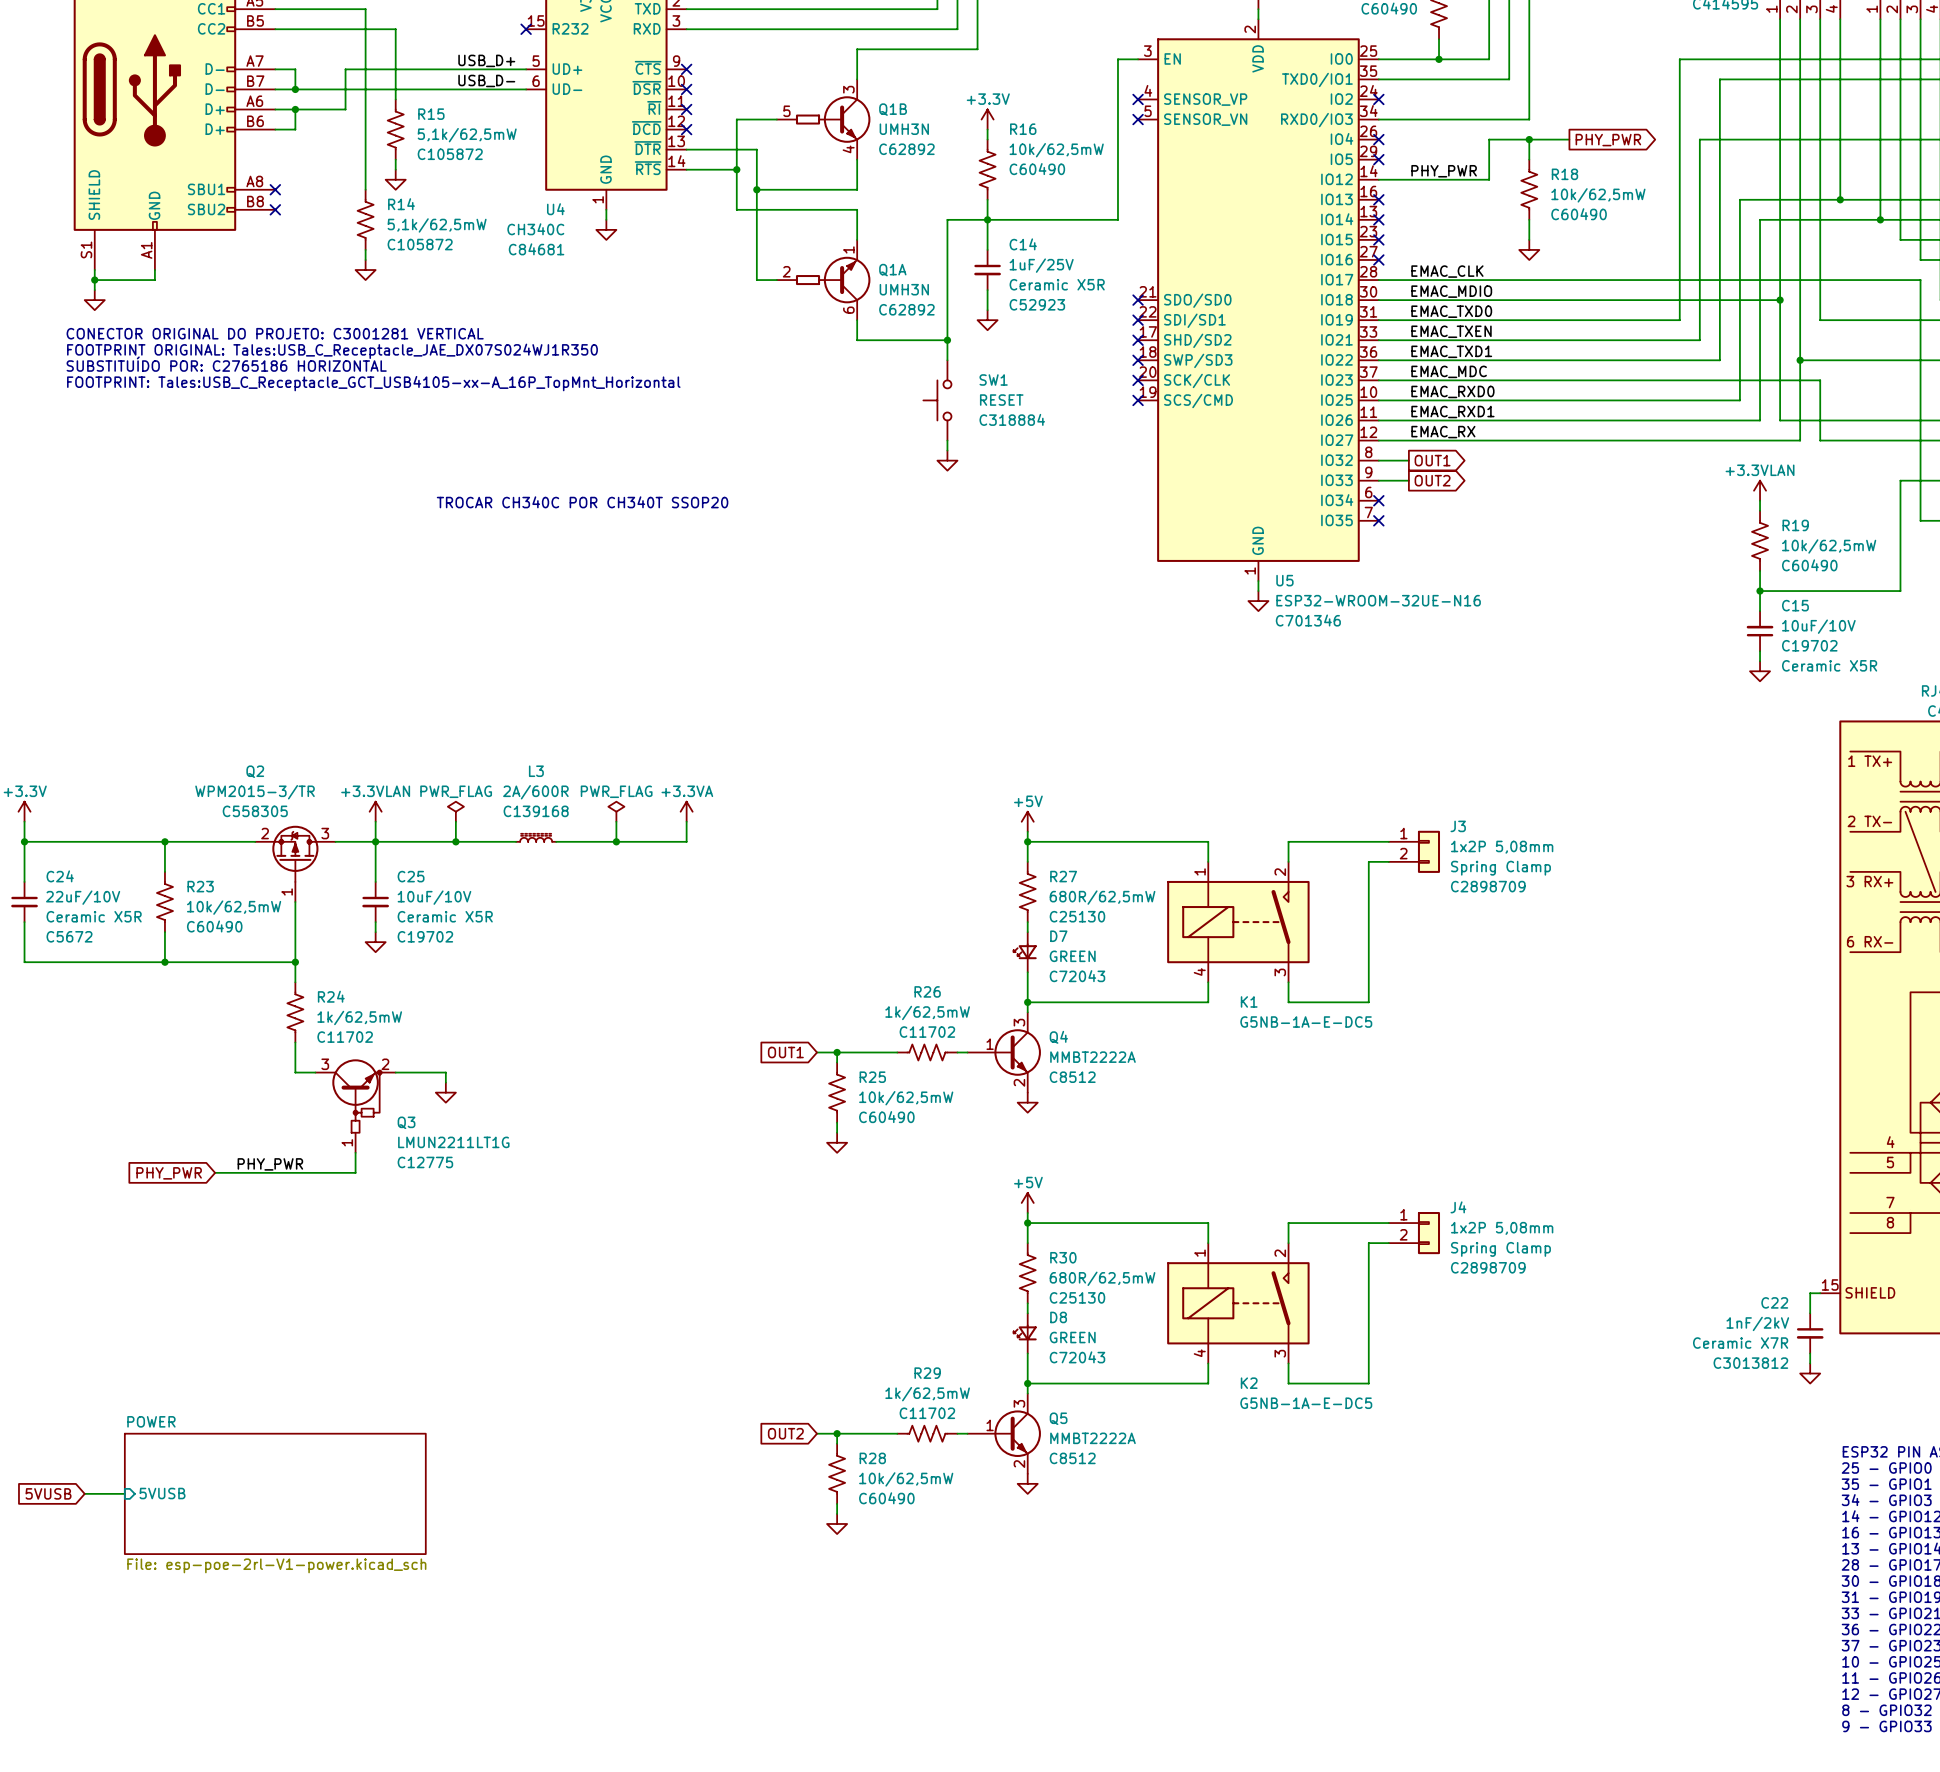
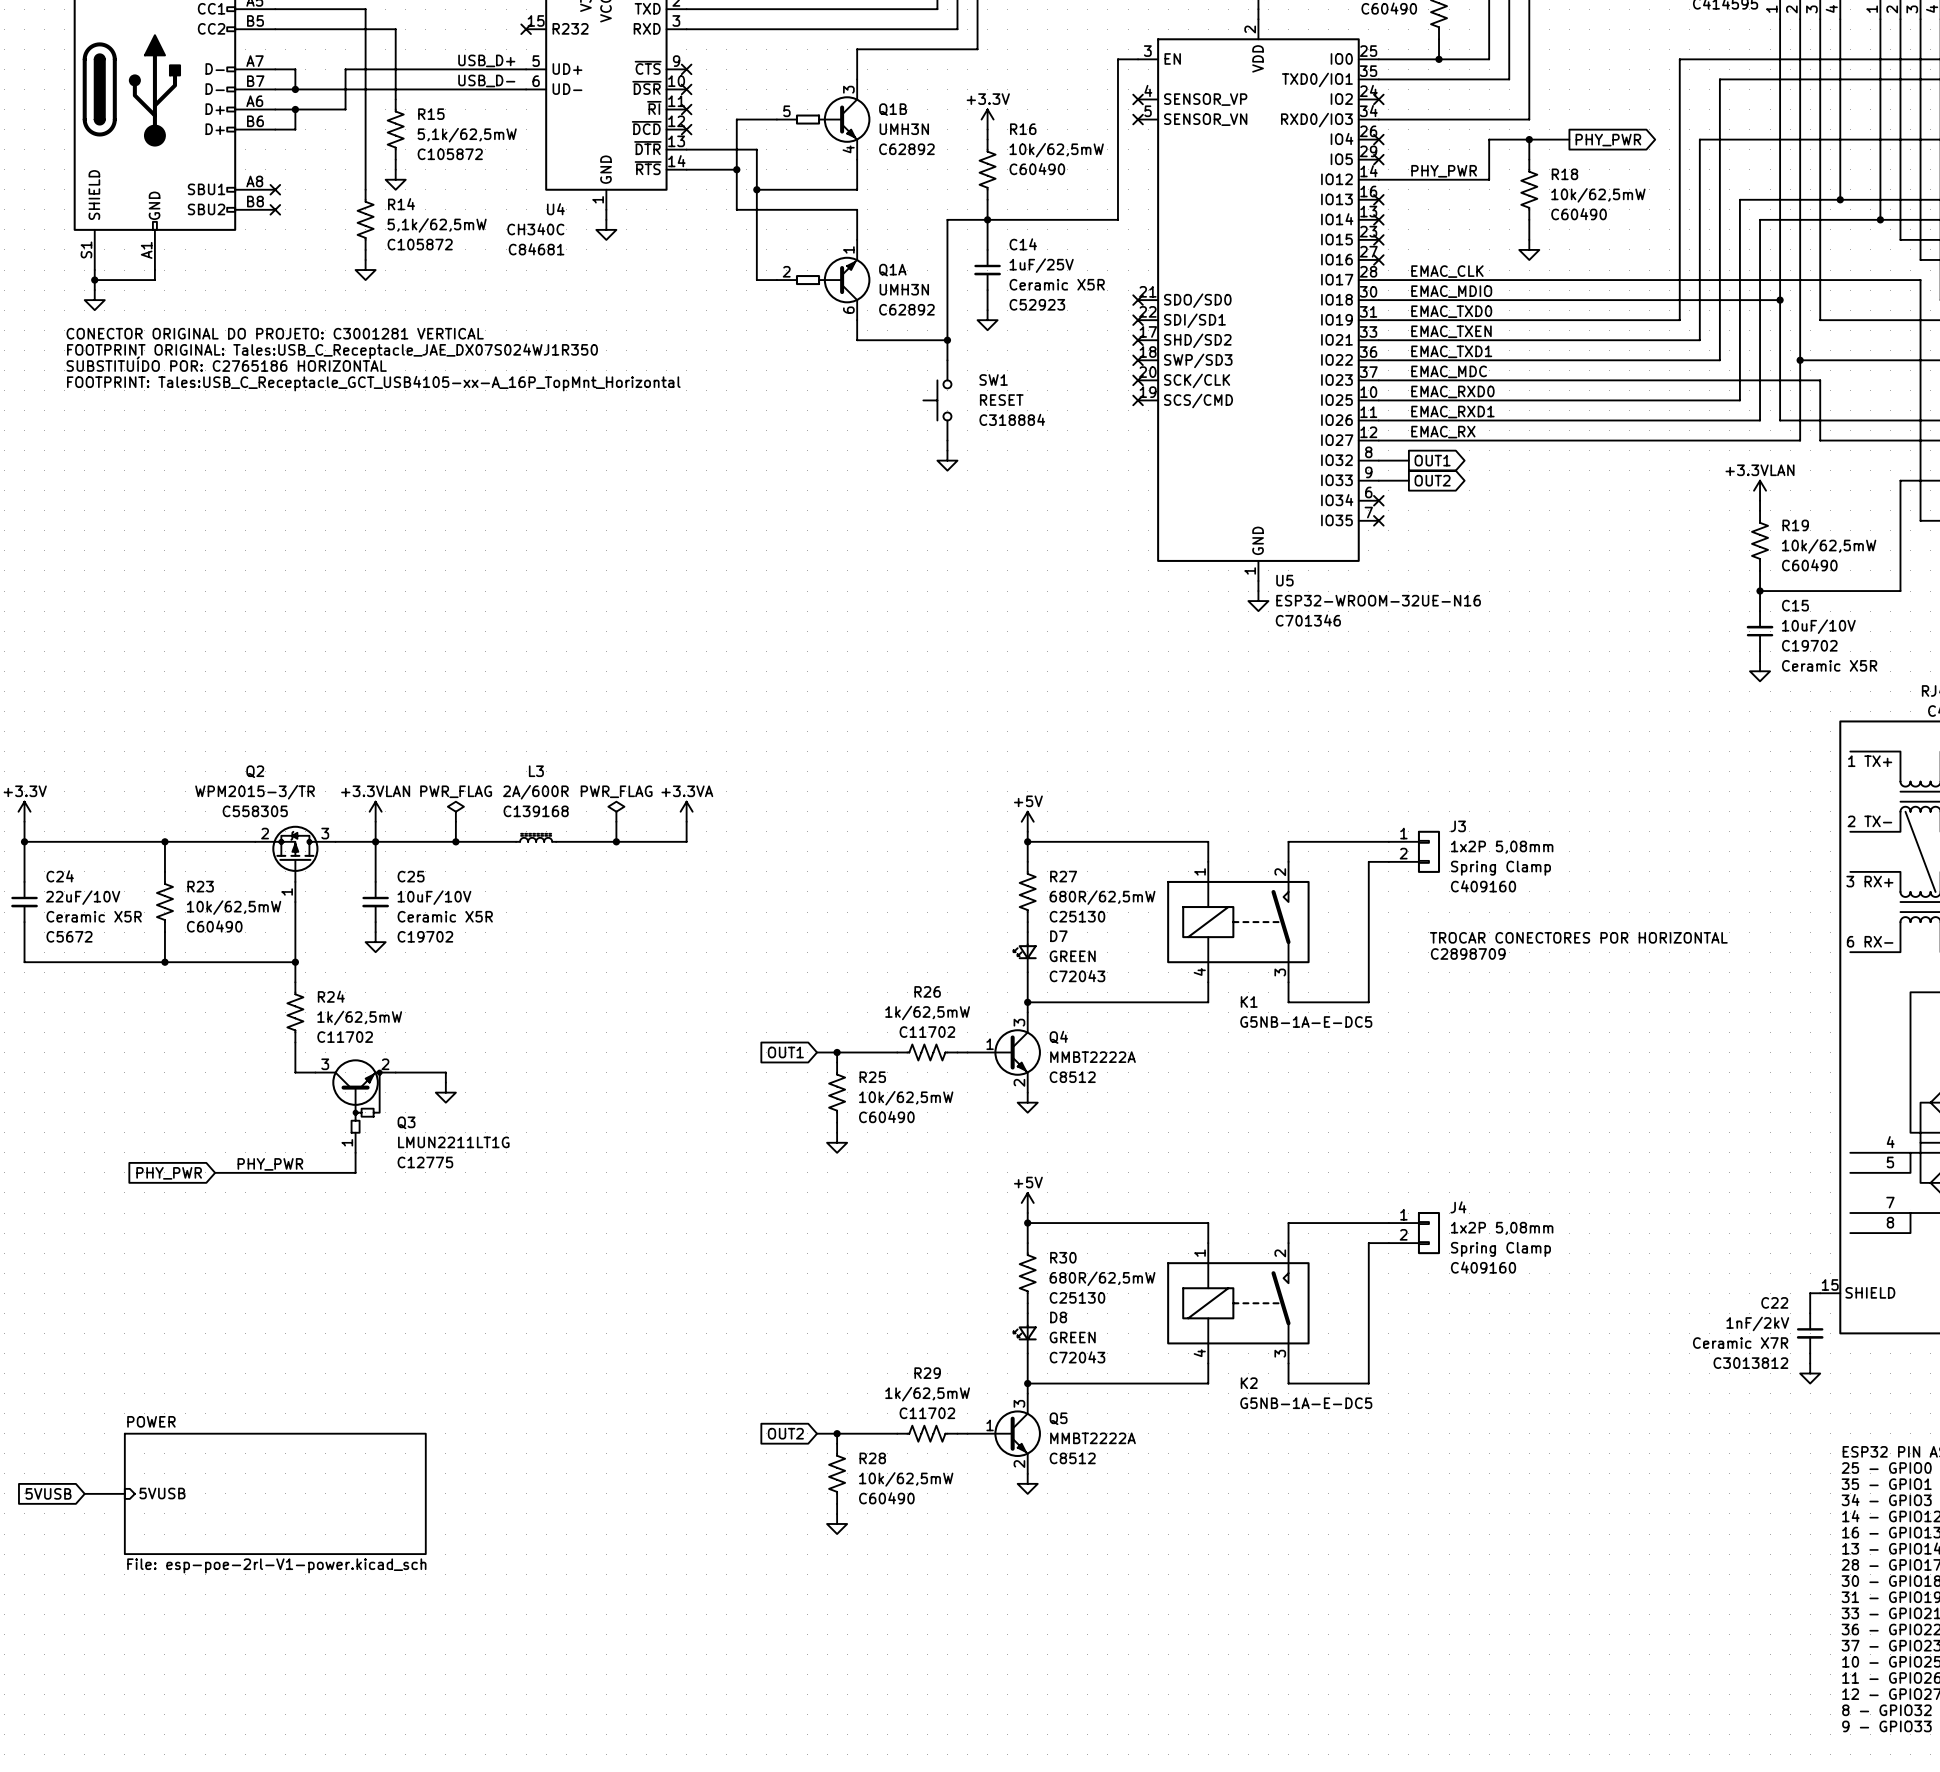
text: TROCAR CH340C POR CH340T SSOP20 (582, 502) -> none
J3 text: C2898709 (1488, 886) -> C409160 (1483, 886)
text: none -> TROCAR CONECTORES POR HORIZONTAL (1578, 937)
text: none -> C2898709 (1468, 953)
J4 text: C2898709 (1488, 1267) -> C409160 (1483, 1267)

